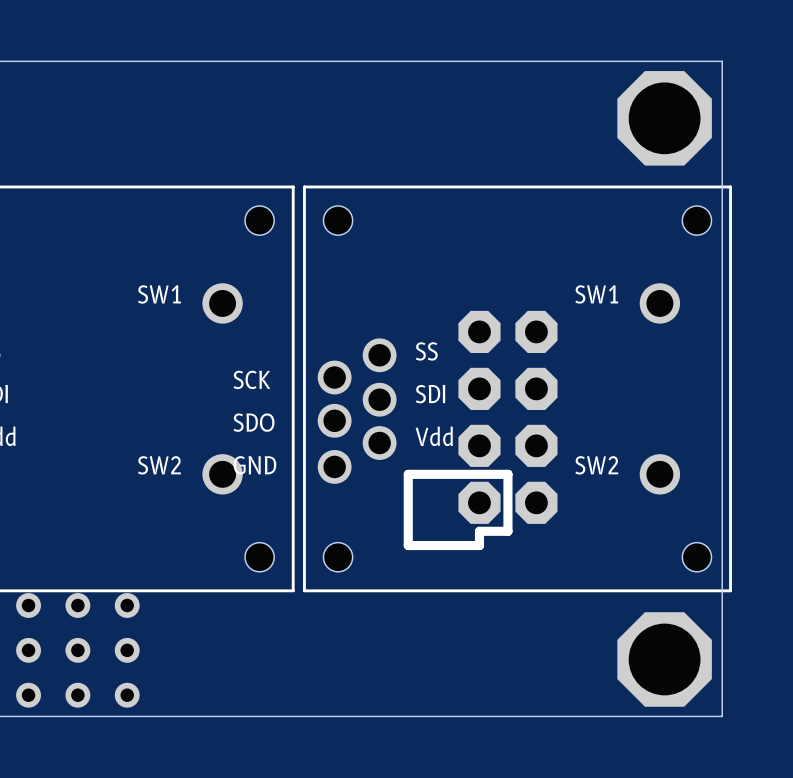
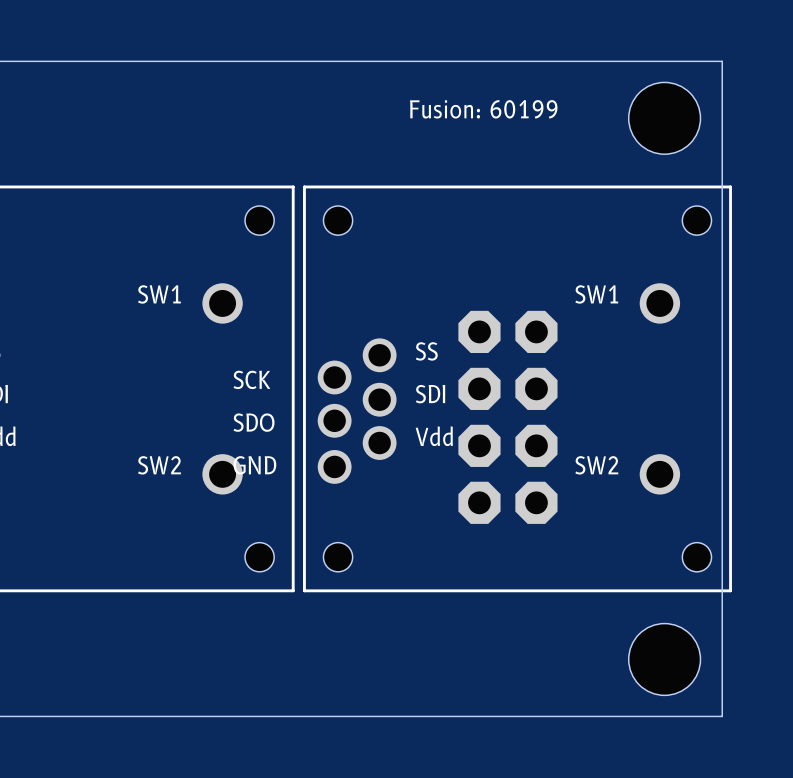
text: none -> Fusion: 60199 (483, 109)
part: (664, 118) -> none
hole: none -> (664, 118)
line: (408, 474) (507, 474) (507, 531) (479, 531) (479, 545) (408, 545) (408, 474) -> none
part: (77, 650) -> none
part: (664, 659) -> none
hole: none -> (664, 659)

